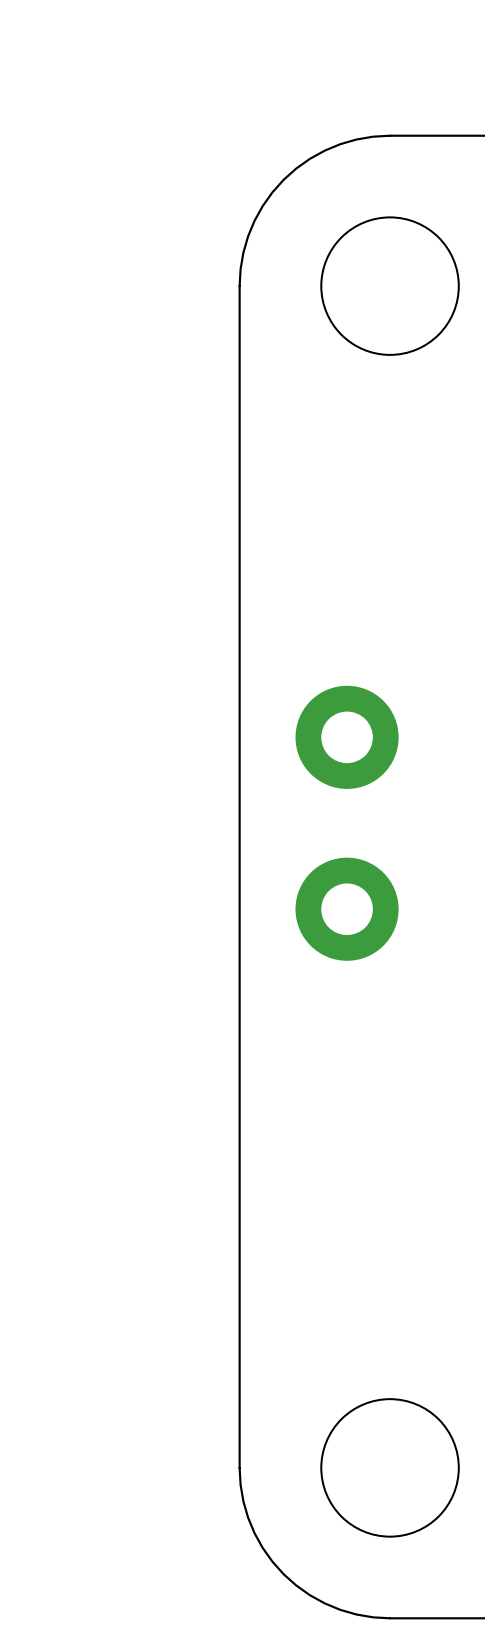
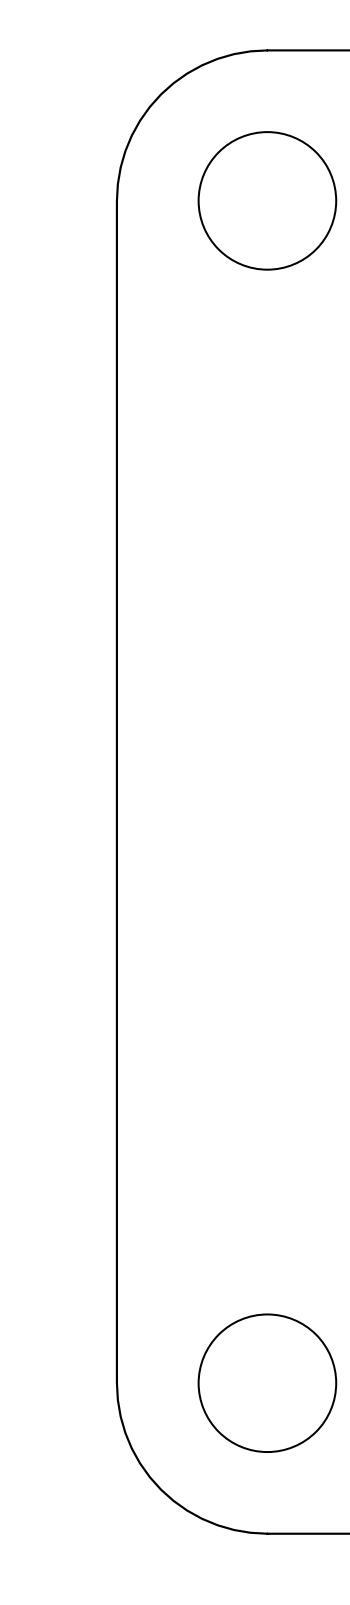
part: (347, 737) -> none
part: (347, 909) -> none

